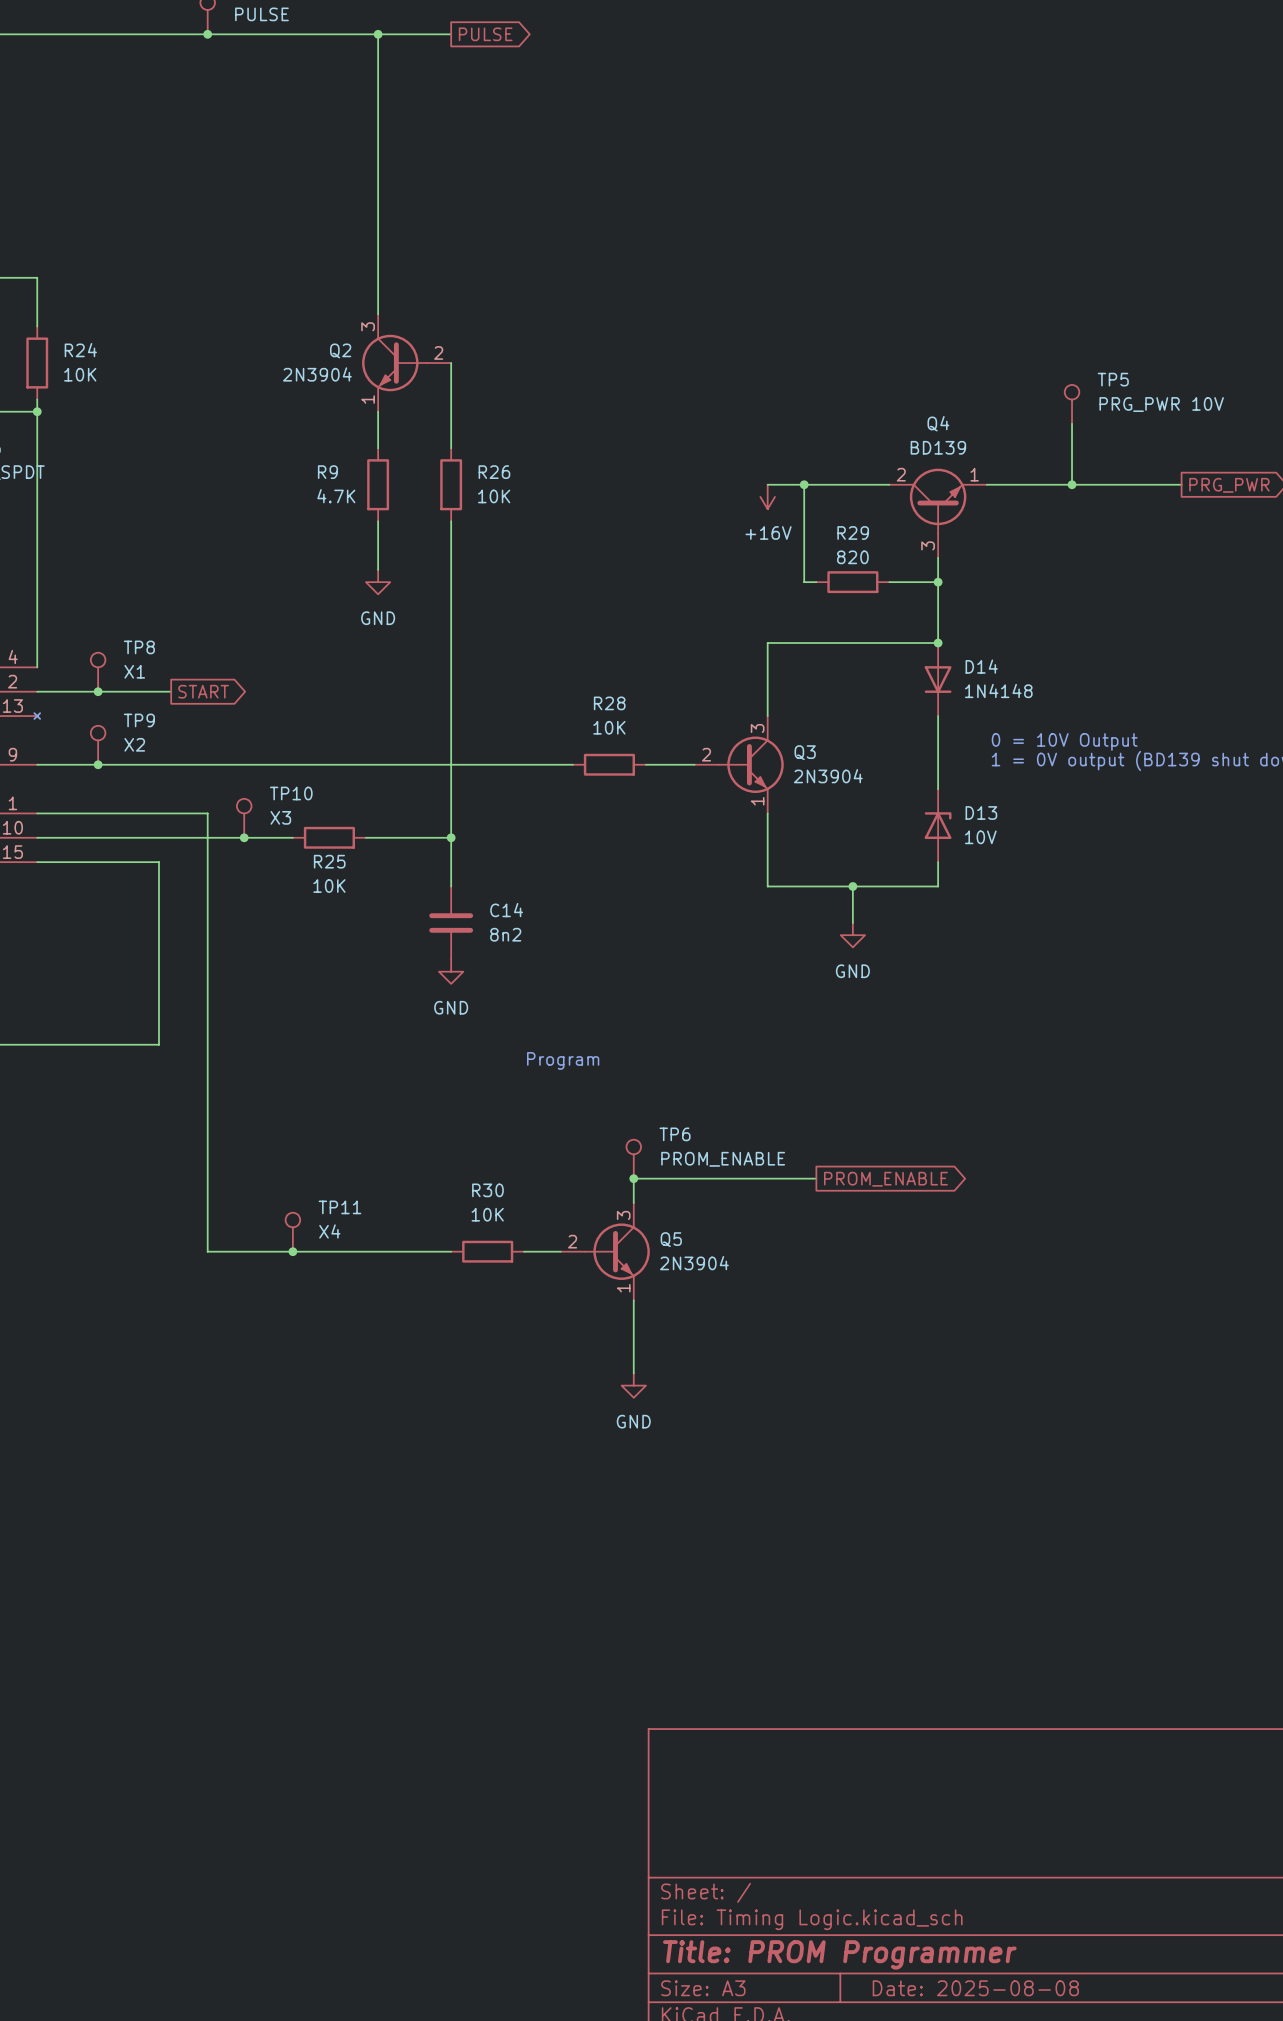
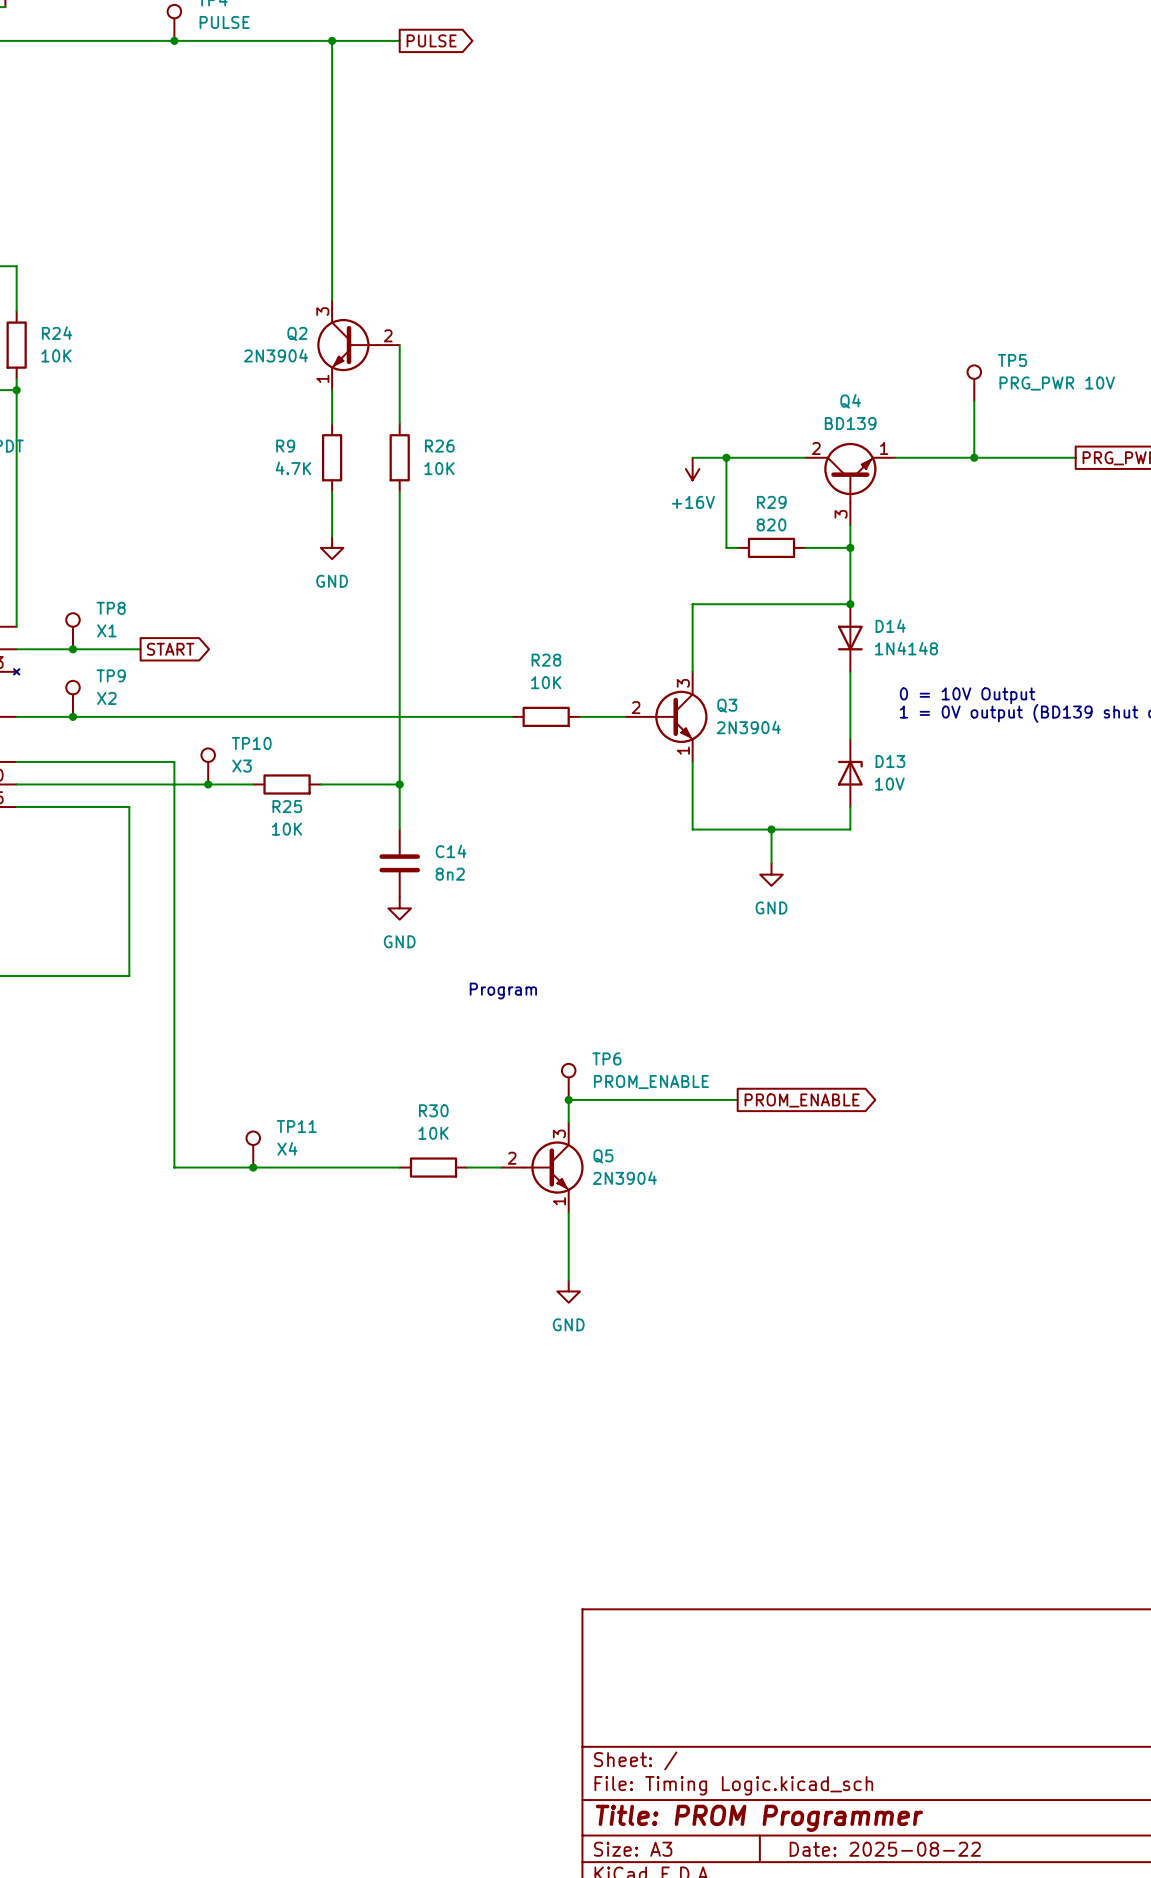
title block: Date: 2025-08-08 (975, 1988) -> Date: 2025-08-22 (885, 1849)

